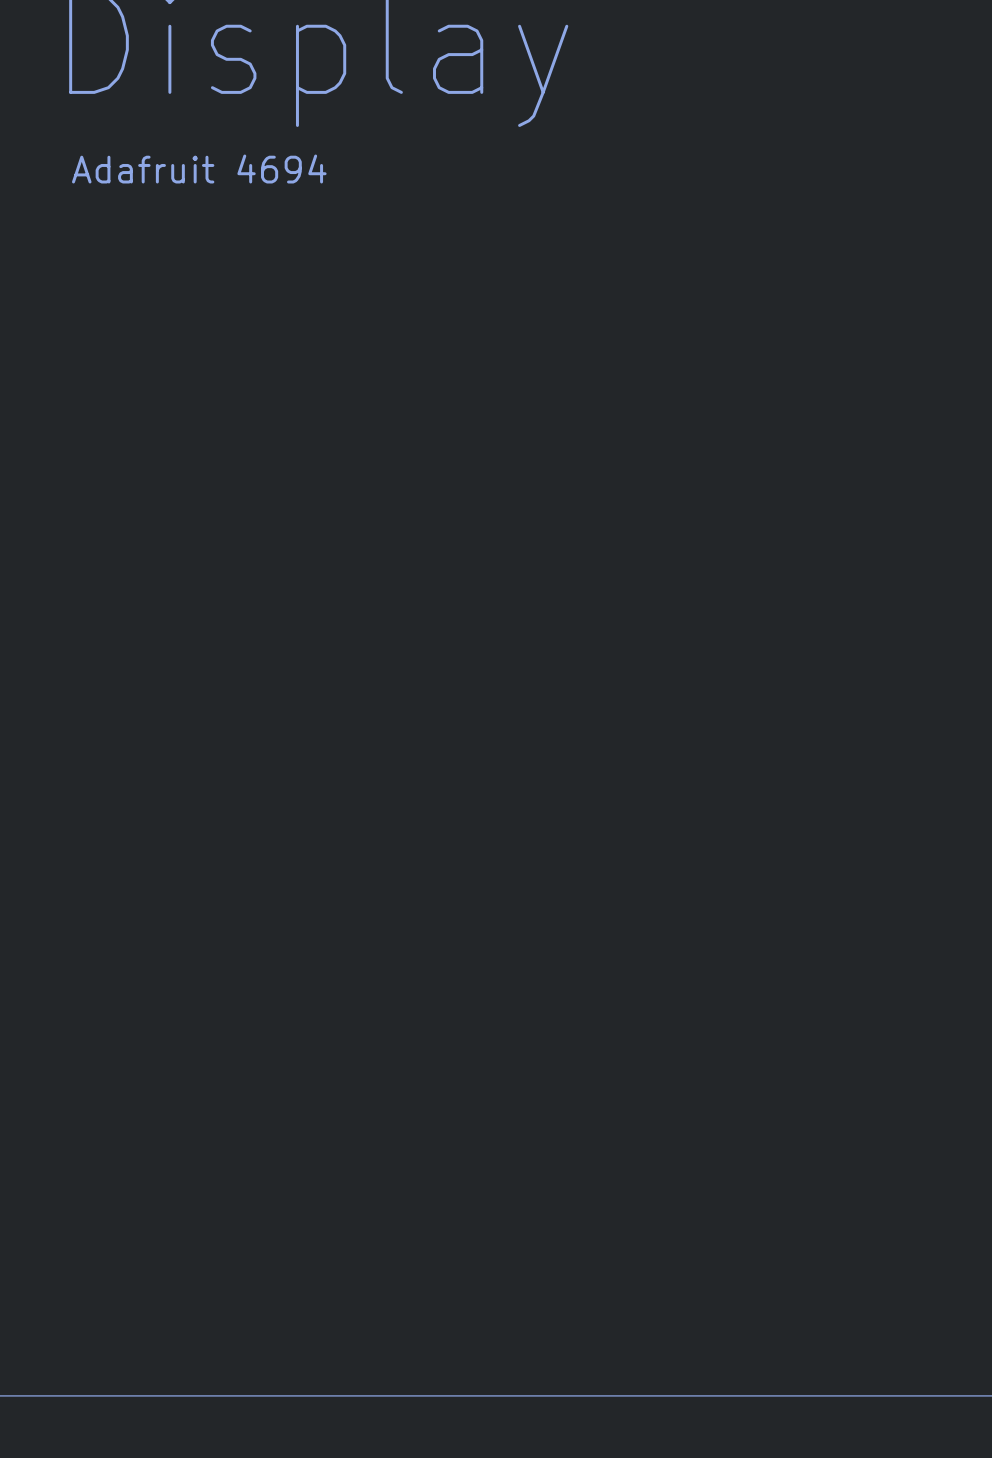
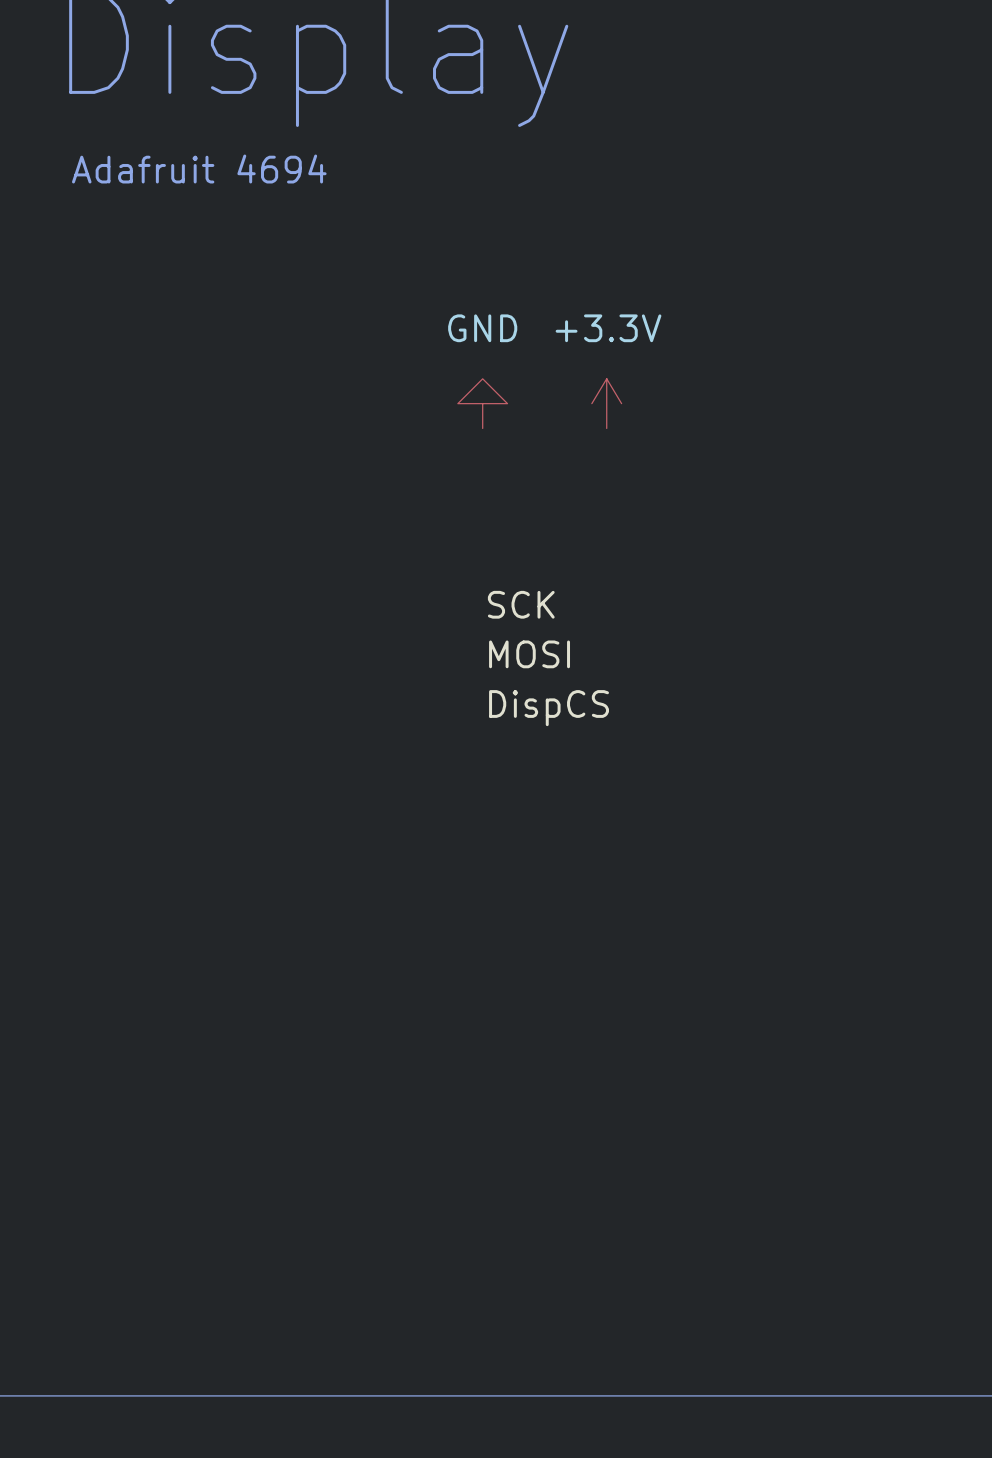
power symbol: none -> GND (482, 403)
power symbol: none -> +3.3V (606, 403)
label: none -> SCK (521, 604)
label: none -> MOSI (529, 654)
label: none -> DispCS (549, 708)

